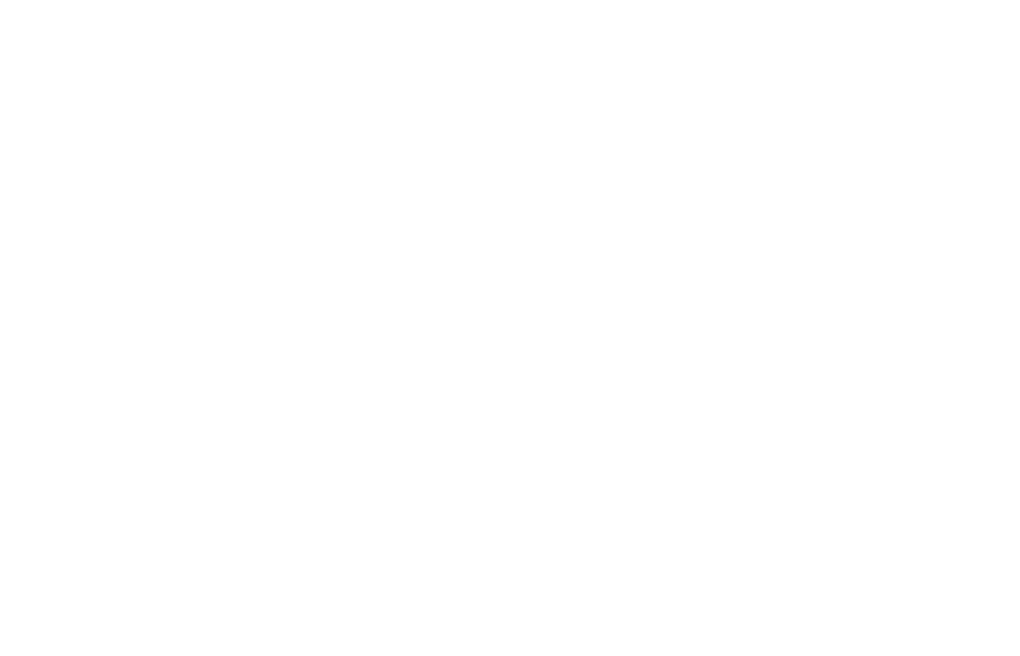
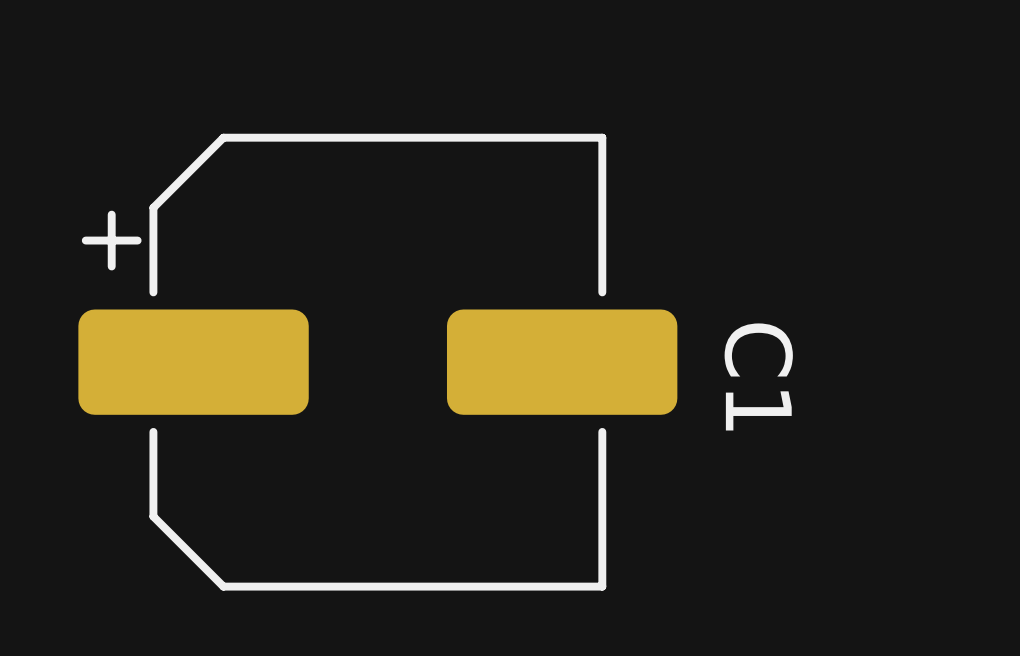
C1: none -> (377, 362)

